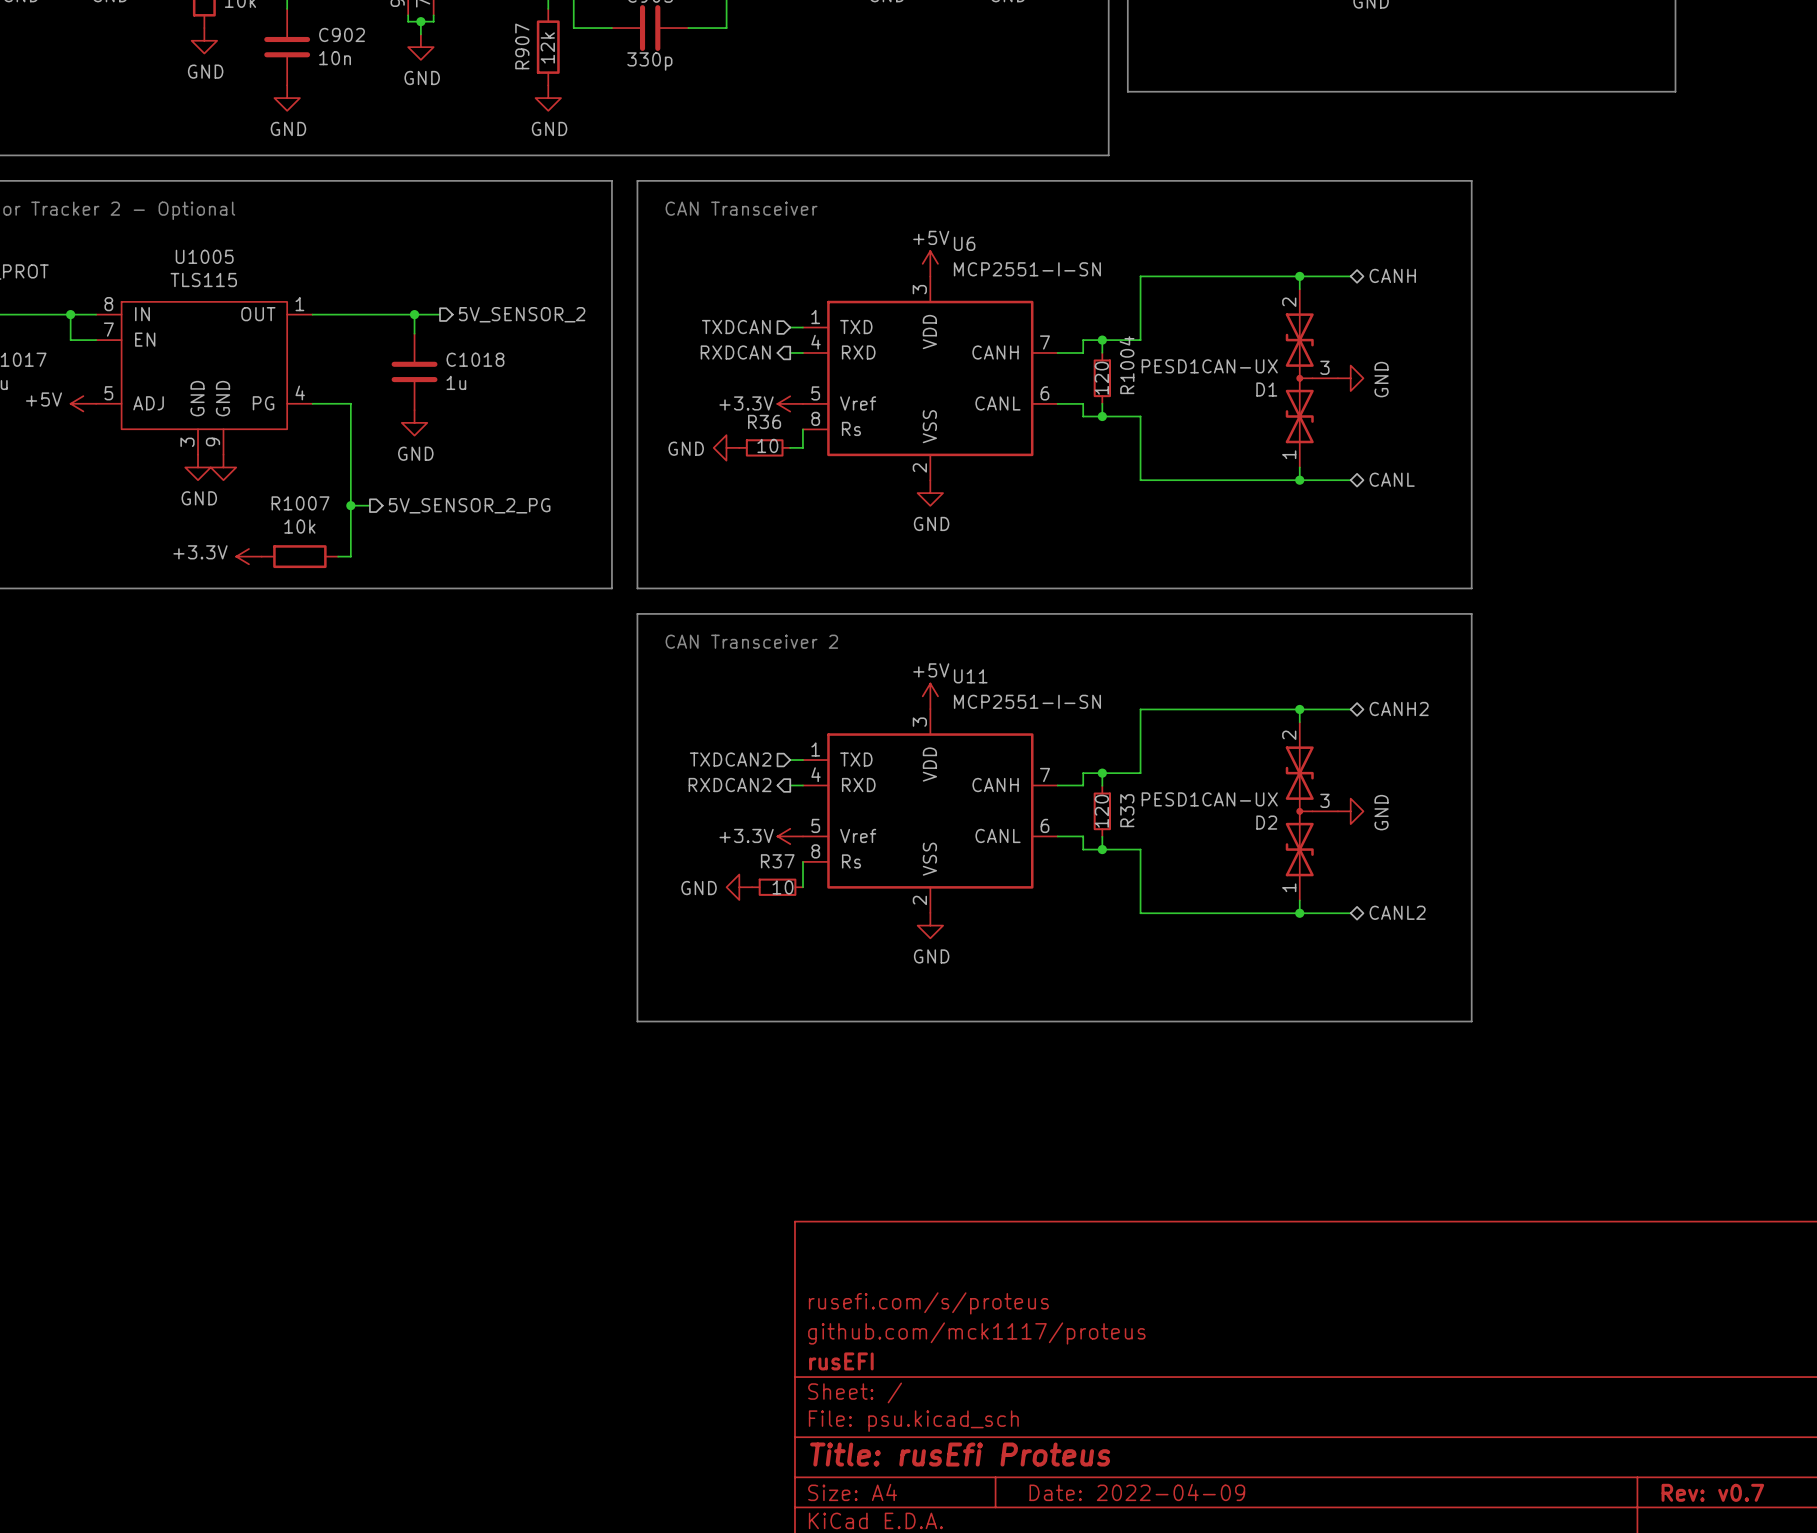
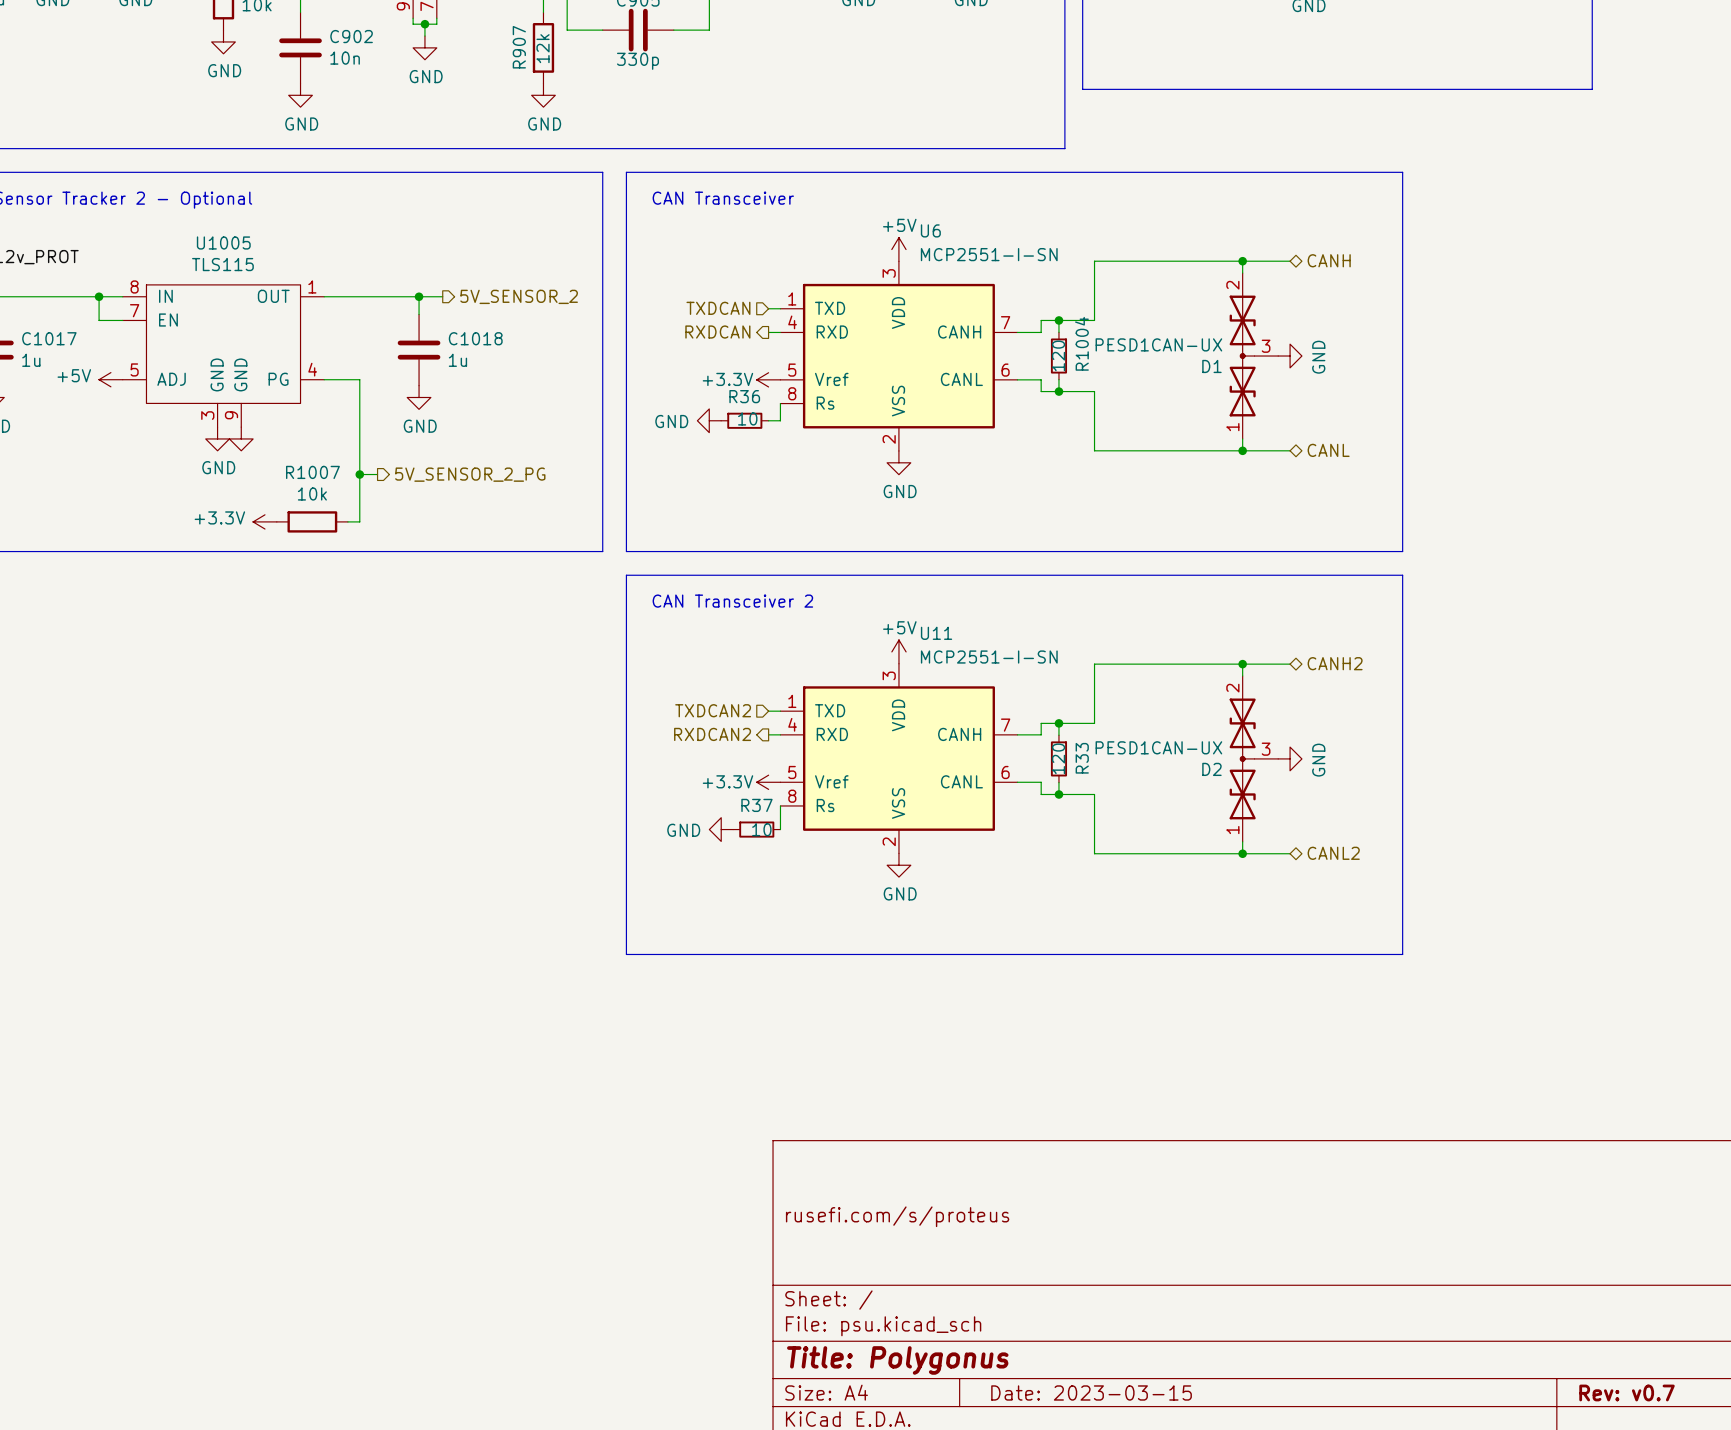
title block: github.com/mck1117/proteus (976, 1333) -> none
title block: rusEFI (841, 1361) -> none
title block: Title: rusEfi Proteus (960, 1454) -> Title: Polygonus (897, 1360)
title block: Date: 2022-04-09 (1137, 1492) -> Date: 2023-03-15 (1091, 1392)

